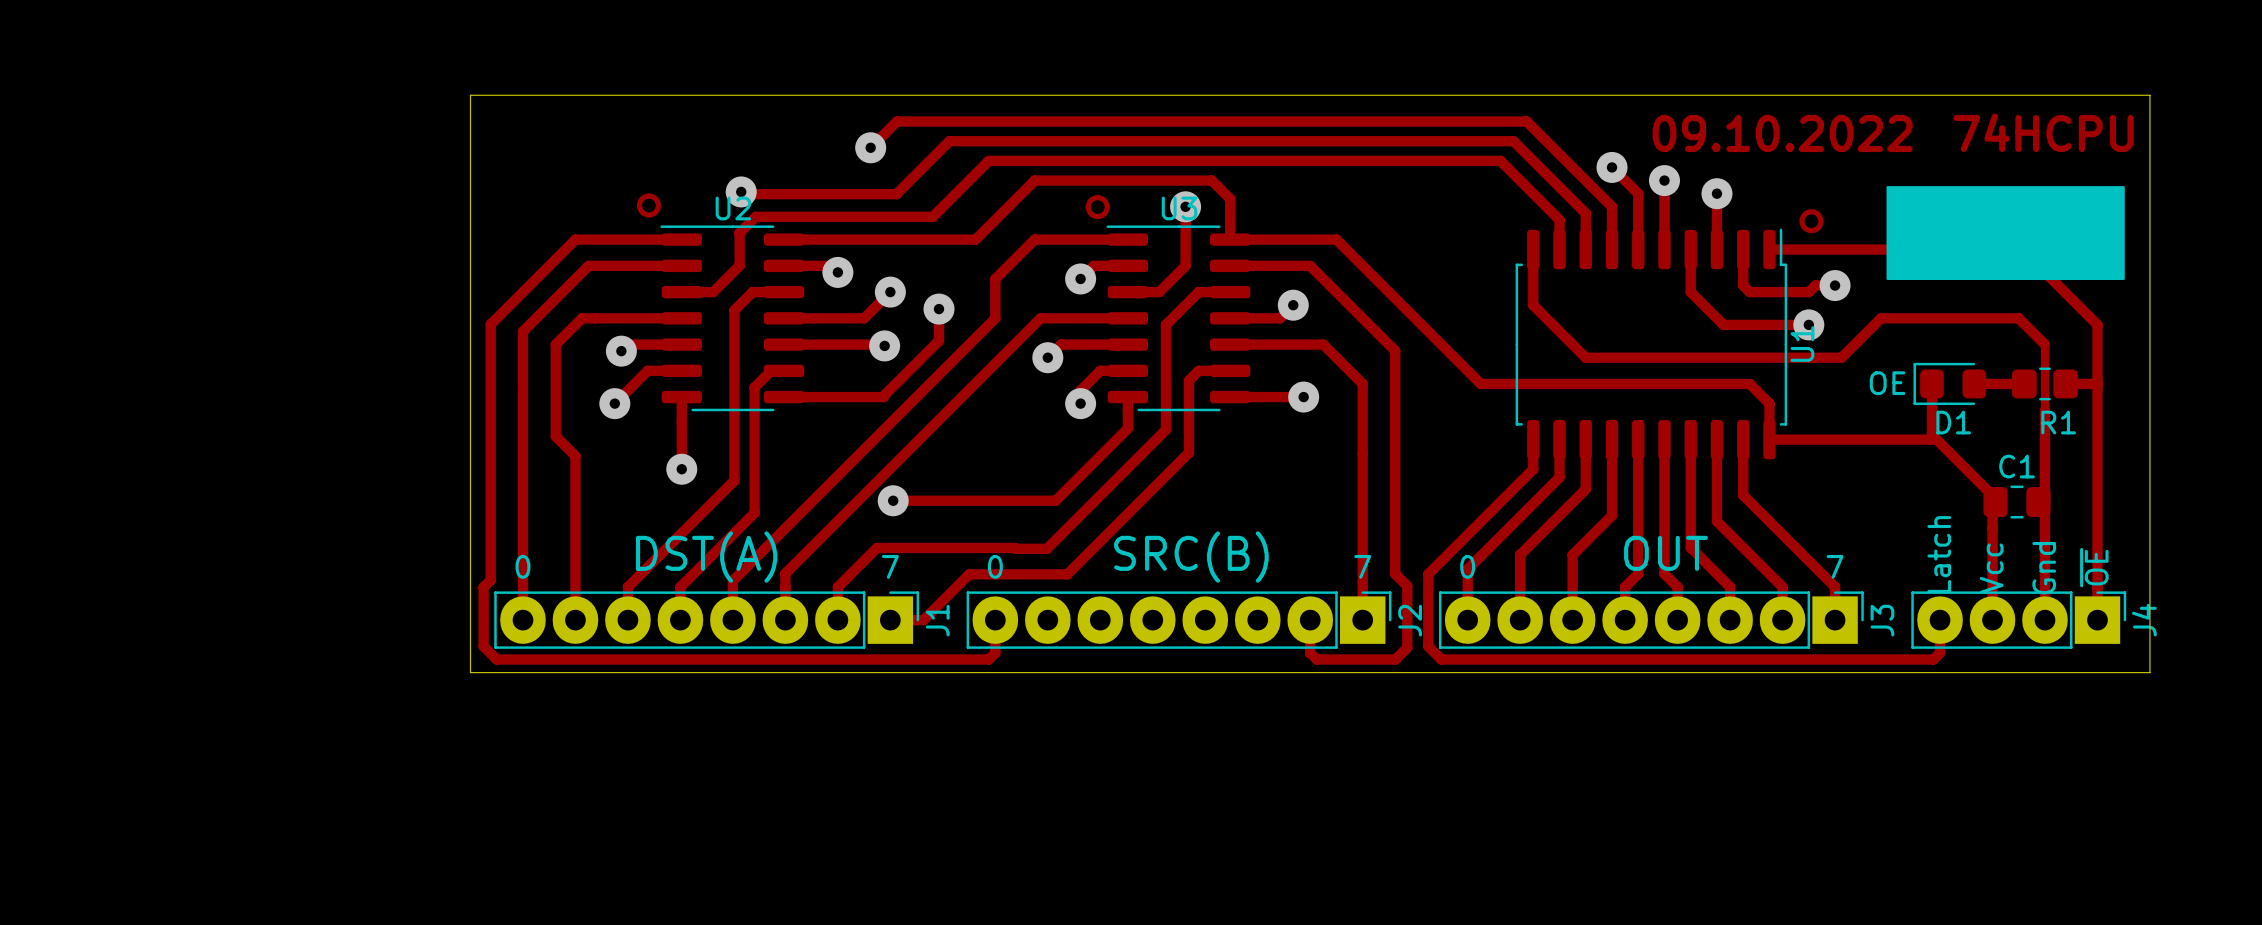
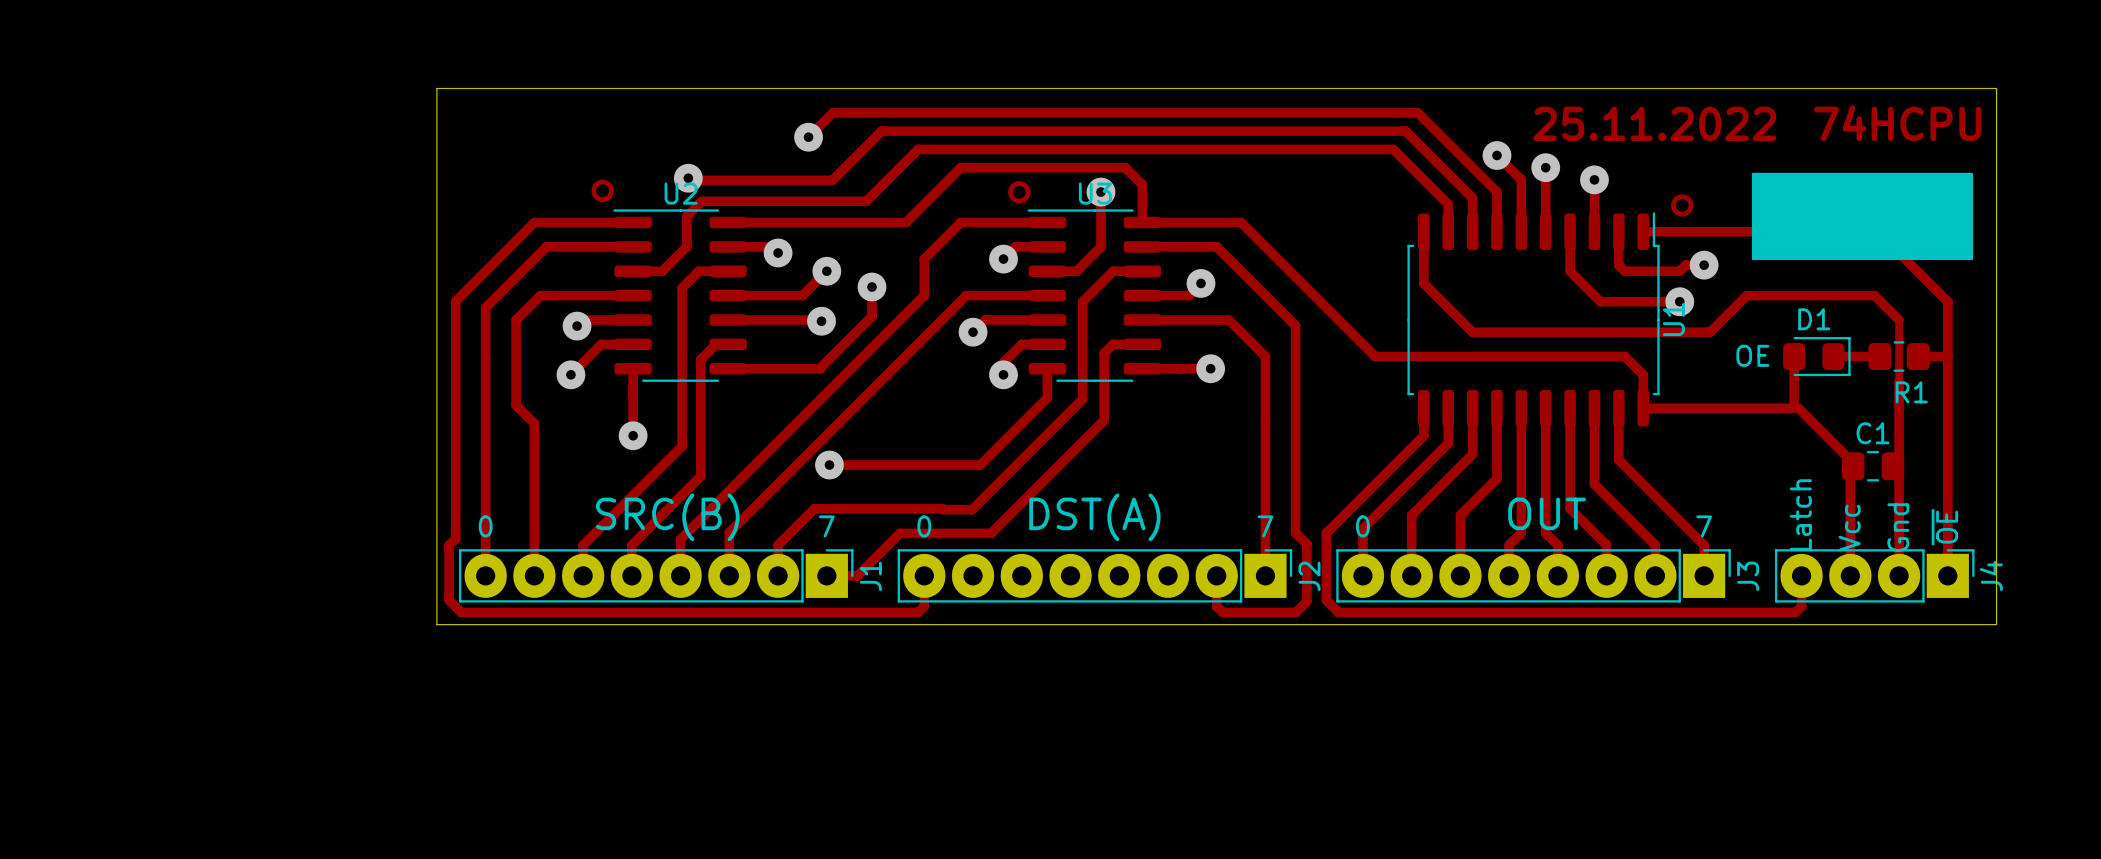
text: 09.10.2022 (1782, 133) -> 25.11.2022 (1654, 123)
D1 rotation: 0° (1949, 383) -> 180° (1816, 356)
text: DST(A) (706, 557) -> SRC(B) (667, 517)
text: SRC(B) (1191, 557) -> DST(A) (1094, 517)

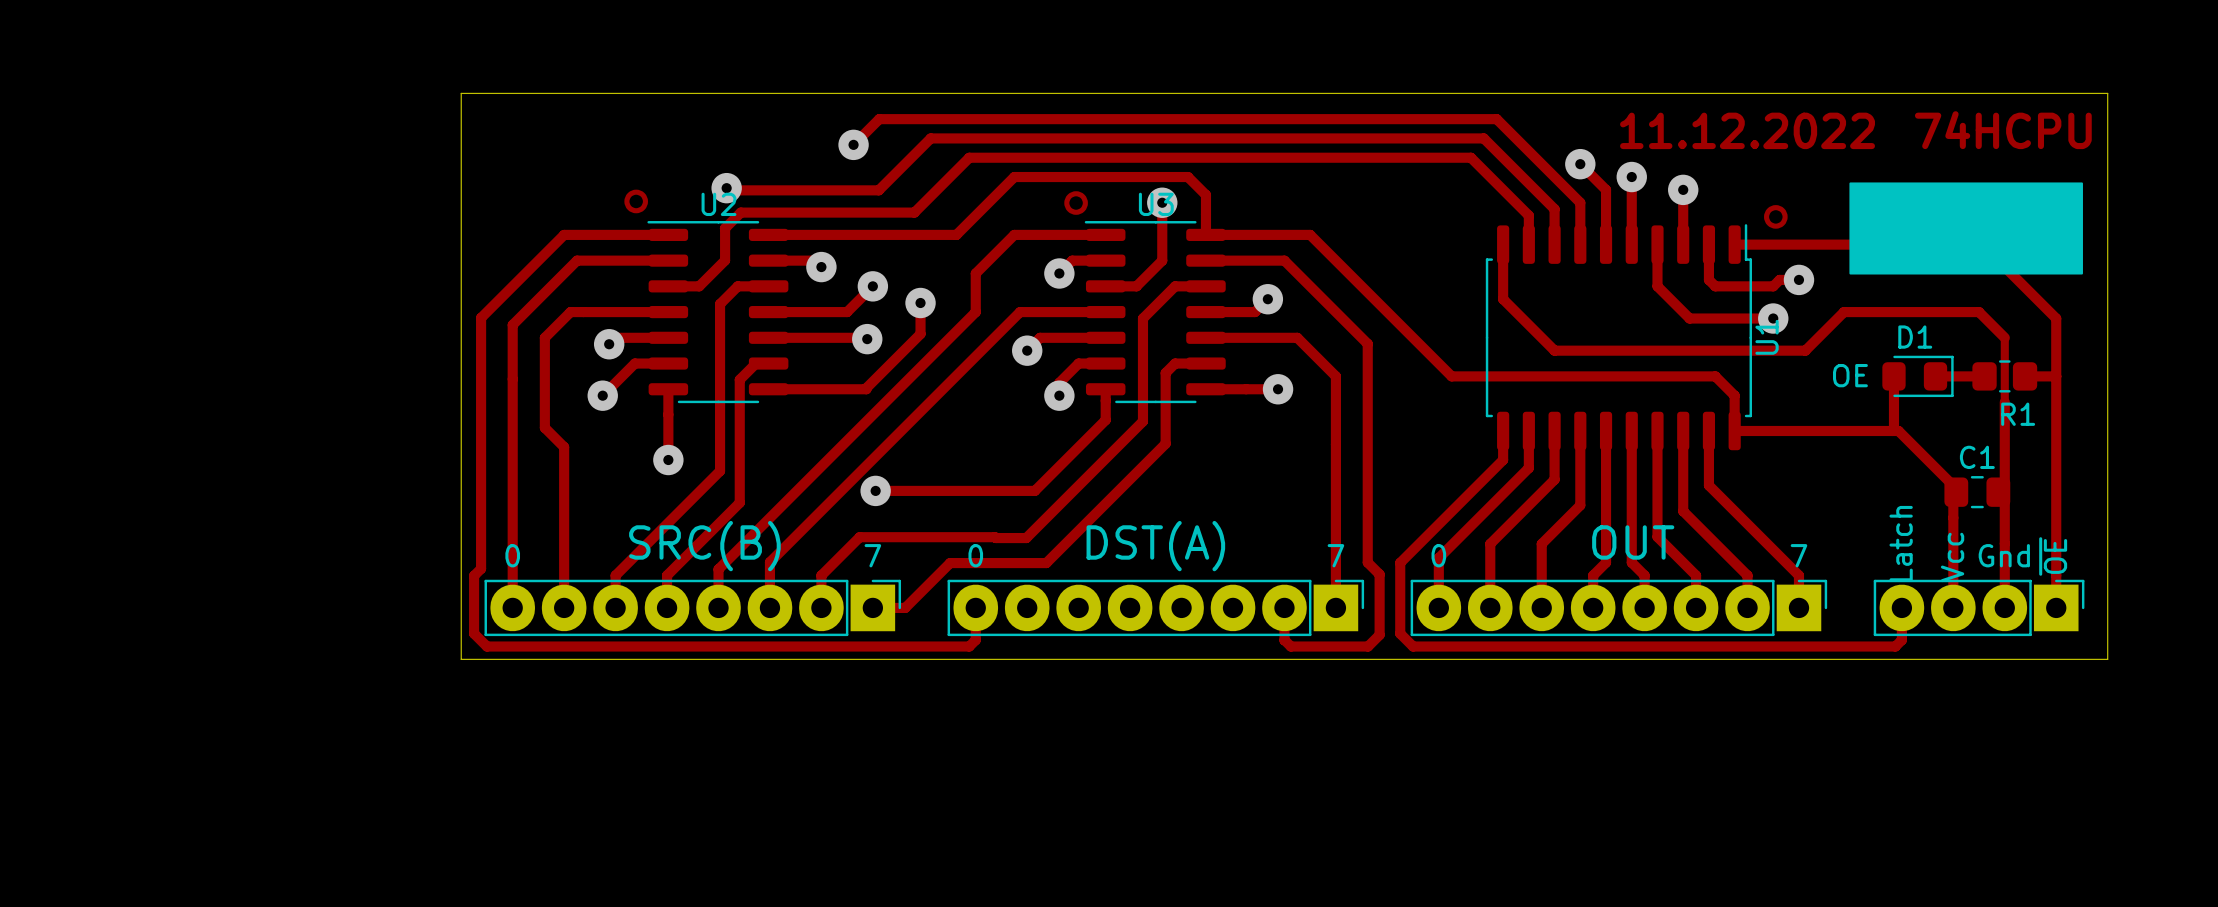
text: 25.11.2022 (1654, 123) -> 11.12.2022 (1747, 130)
text rotation: 0° (1898, 527) -> 90° clockwise (2004, 555)
J4 name: J4 (1991, 575) -> none
J1 name: J1 (870, 576) -> none
J2 name: J2 (1309, 576) -> none
J3 name: J3 (1748, 576) -> none

